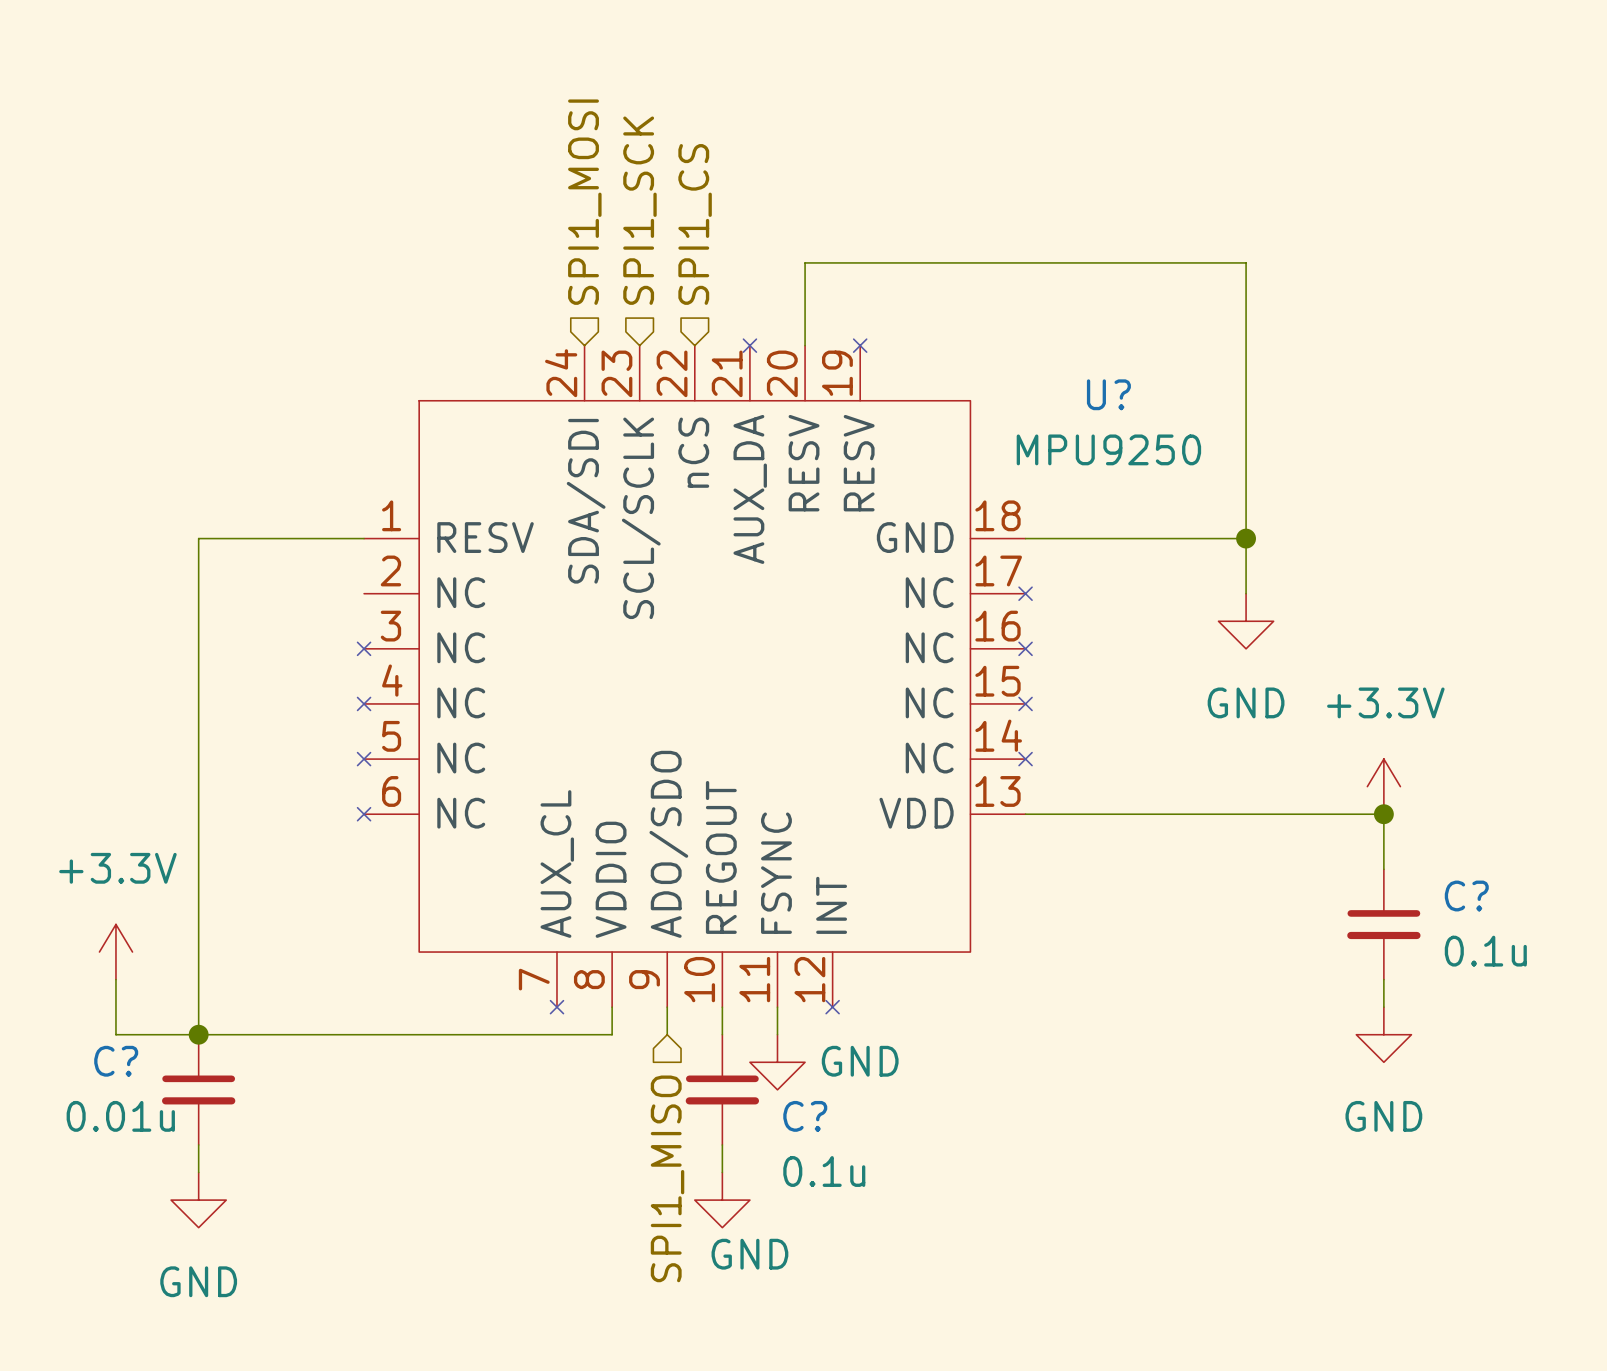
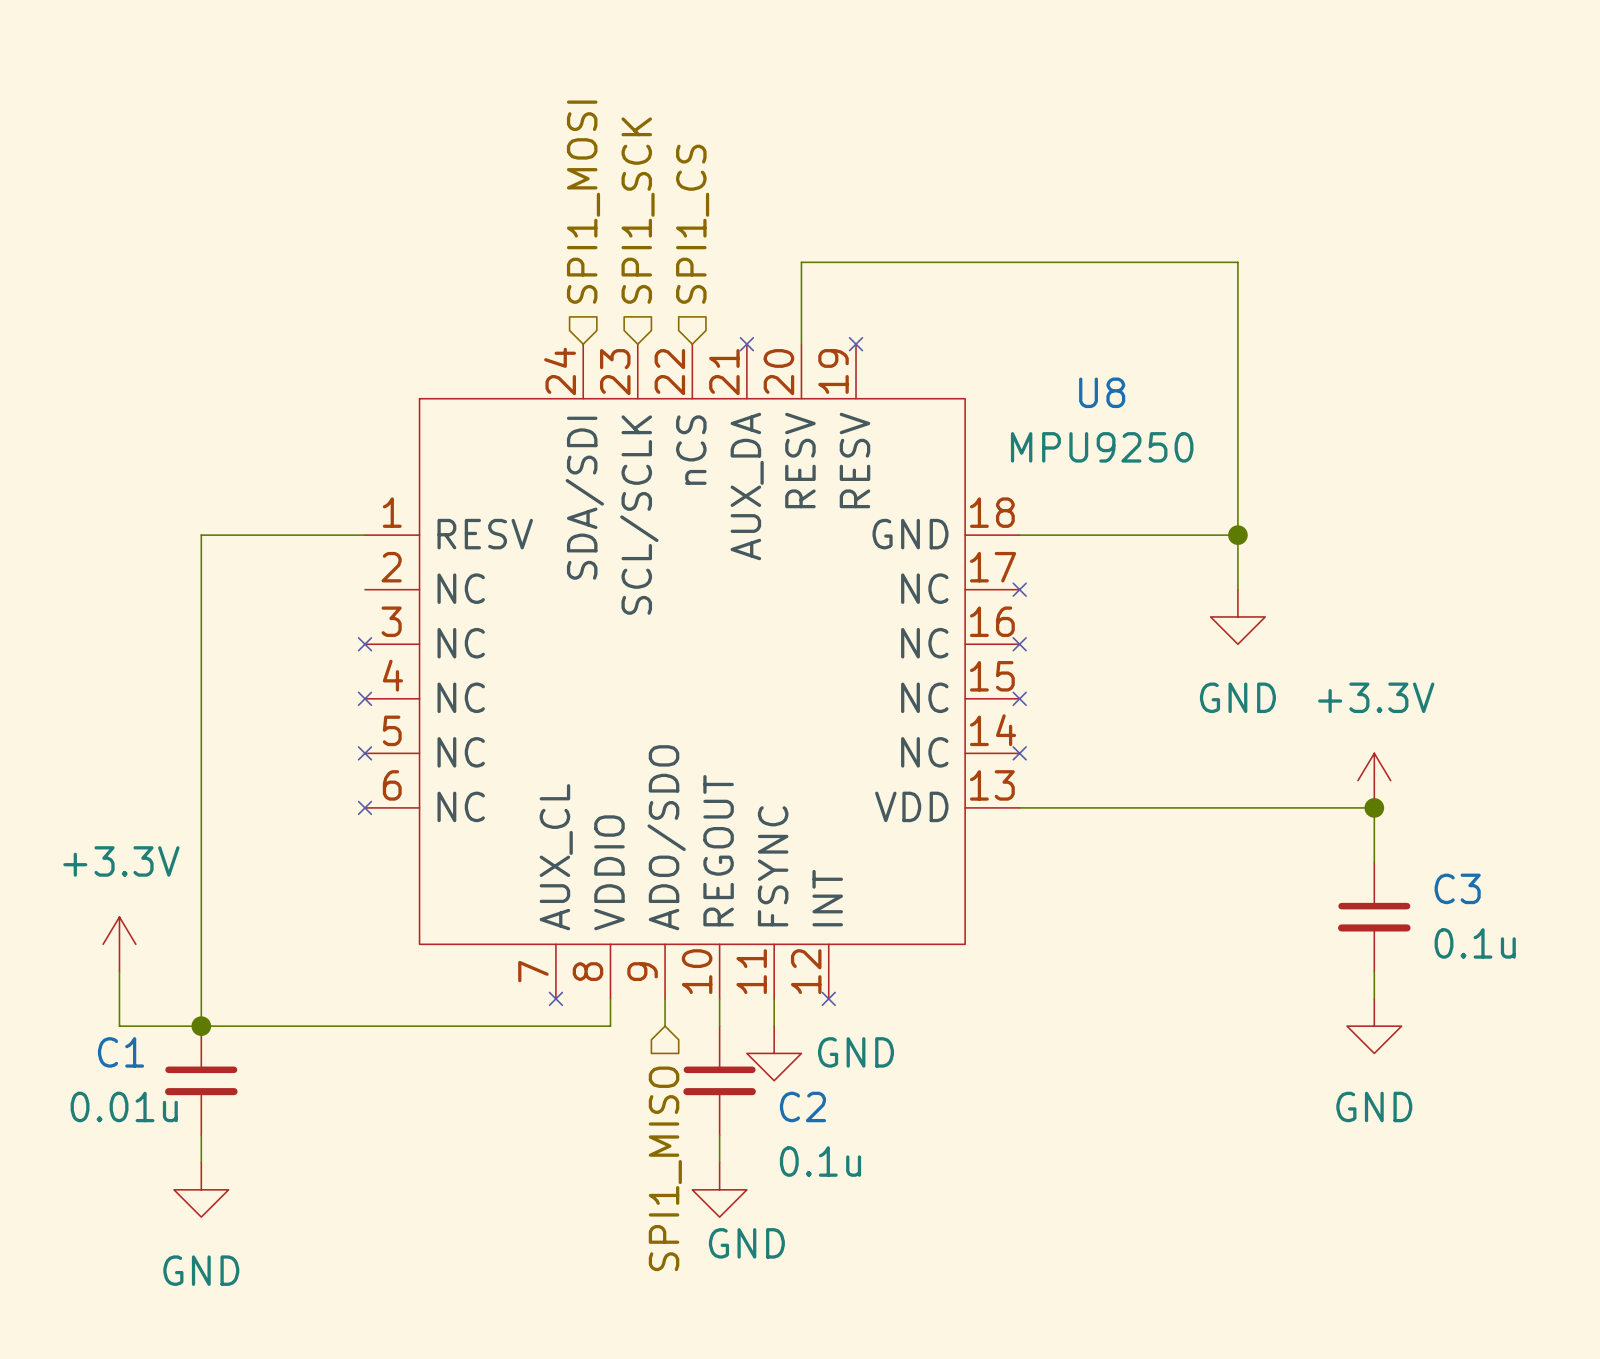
U? name: U? (1108, 394) -> U8 (1102, 392)
C? name: C? (1466, 896) -> C3 (1457, 888)
C? name: C? (116, 1061) -> C1 (120, 1052)
C? name: C? (805, 1116) -> C2 (802, 1106)

